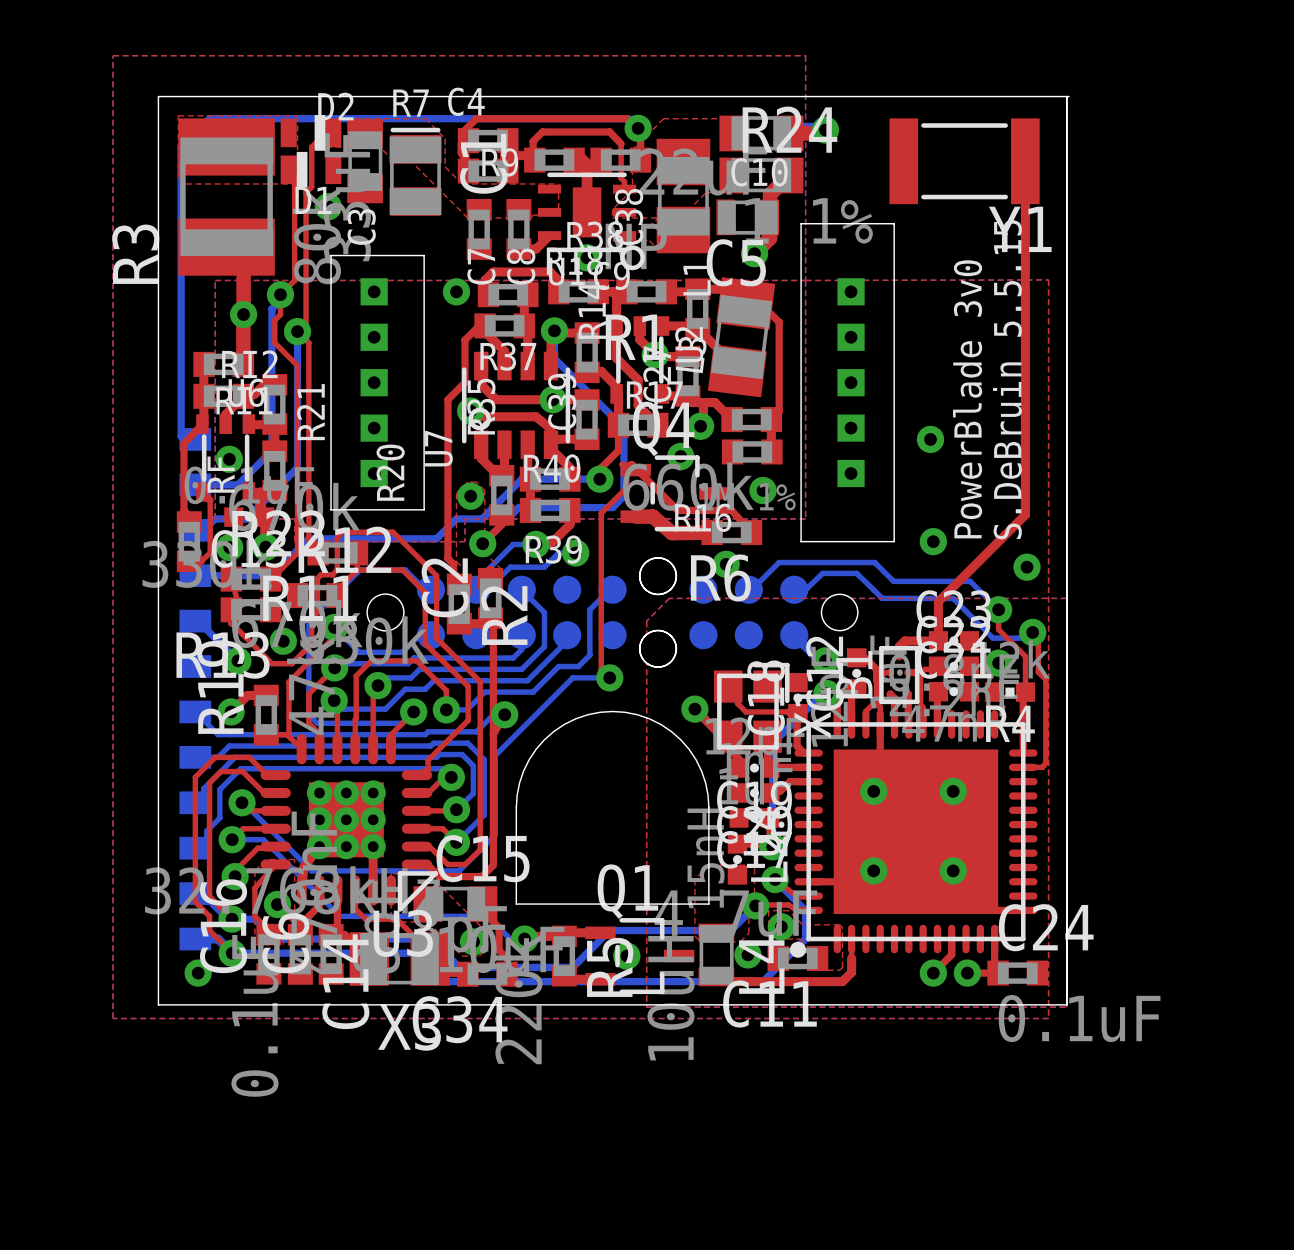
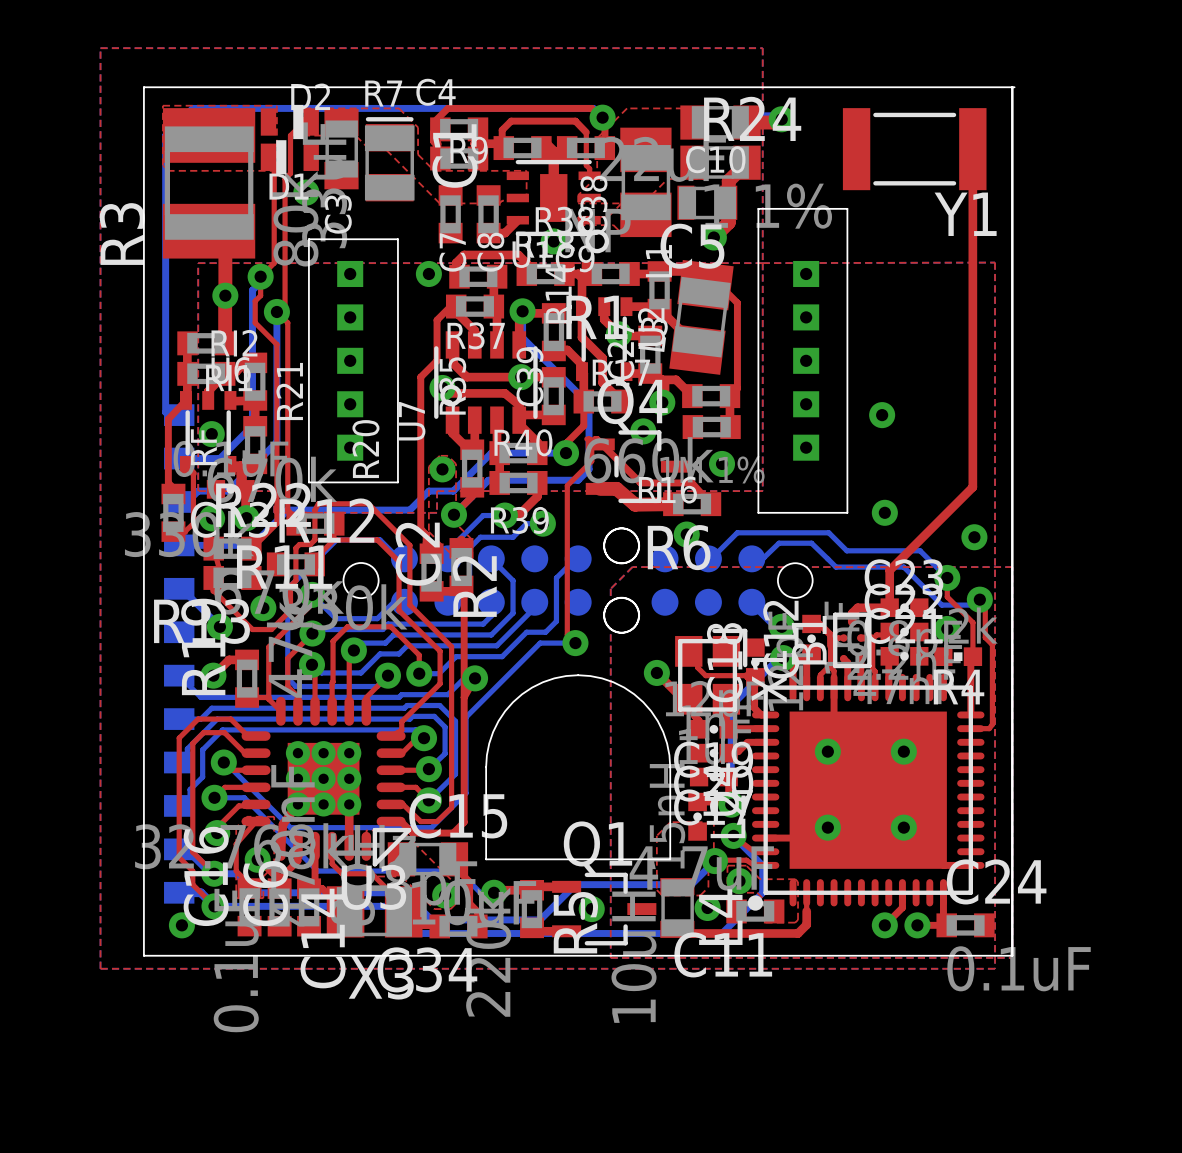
text: S.DeBruin 5.5.15 (1007, 379) -> none
text: PowerBlade 3v0 (967, 399) -> none

